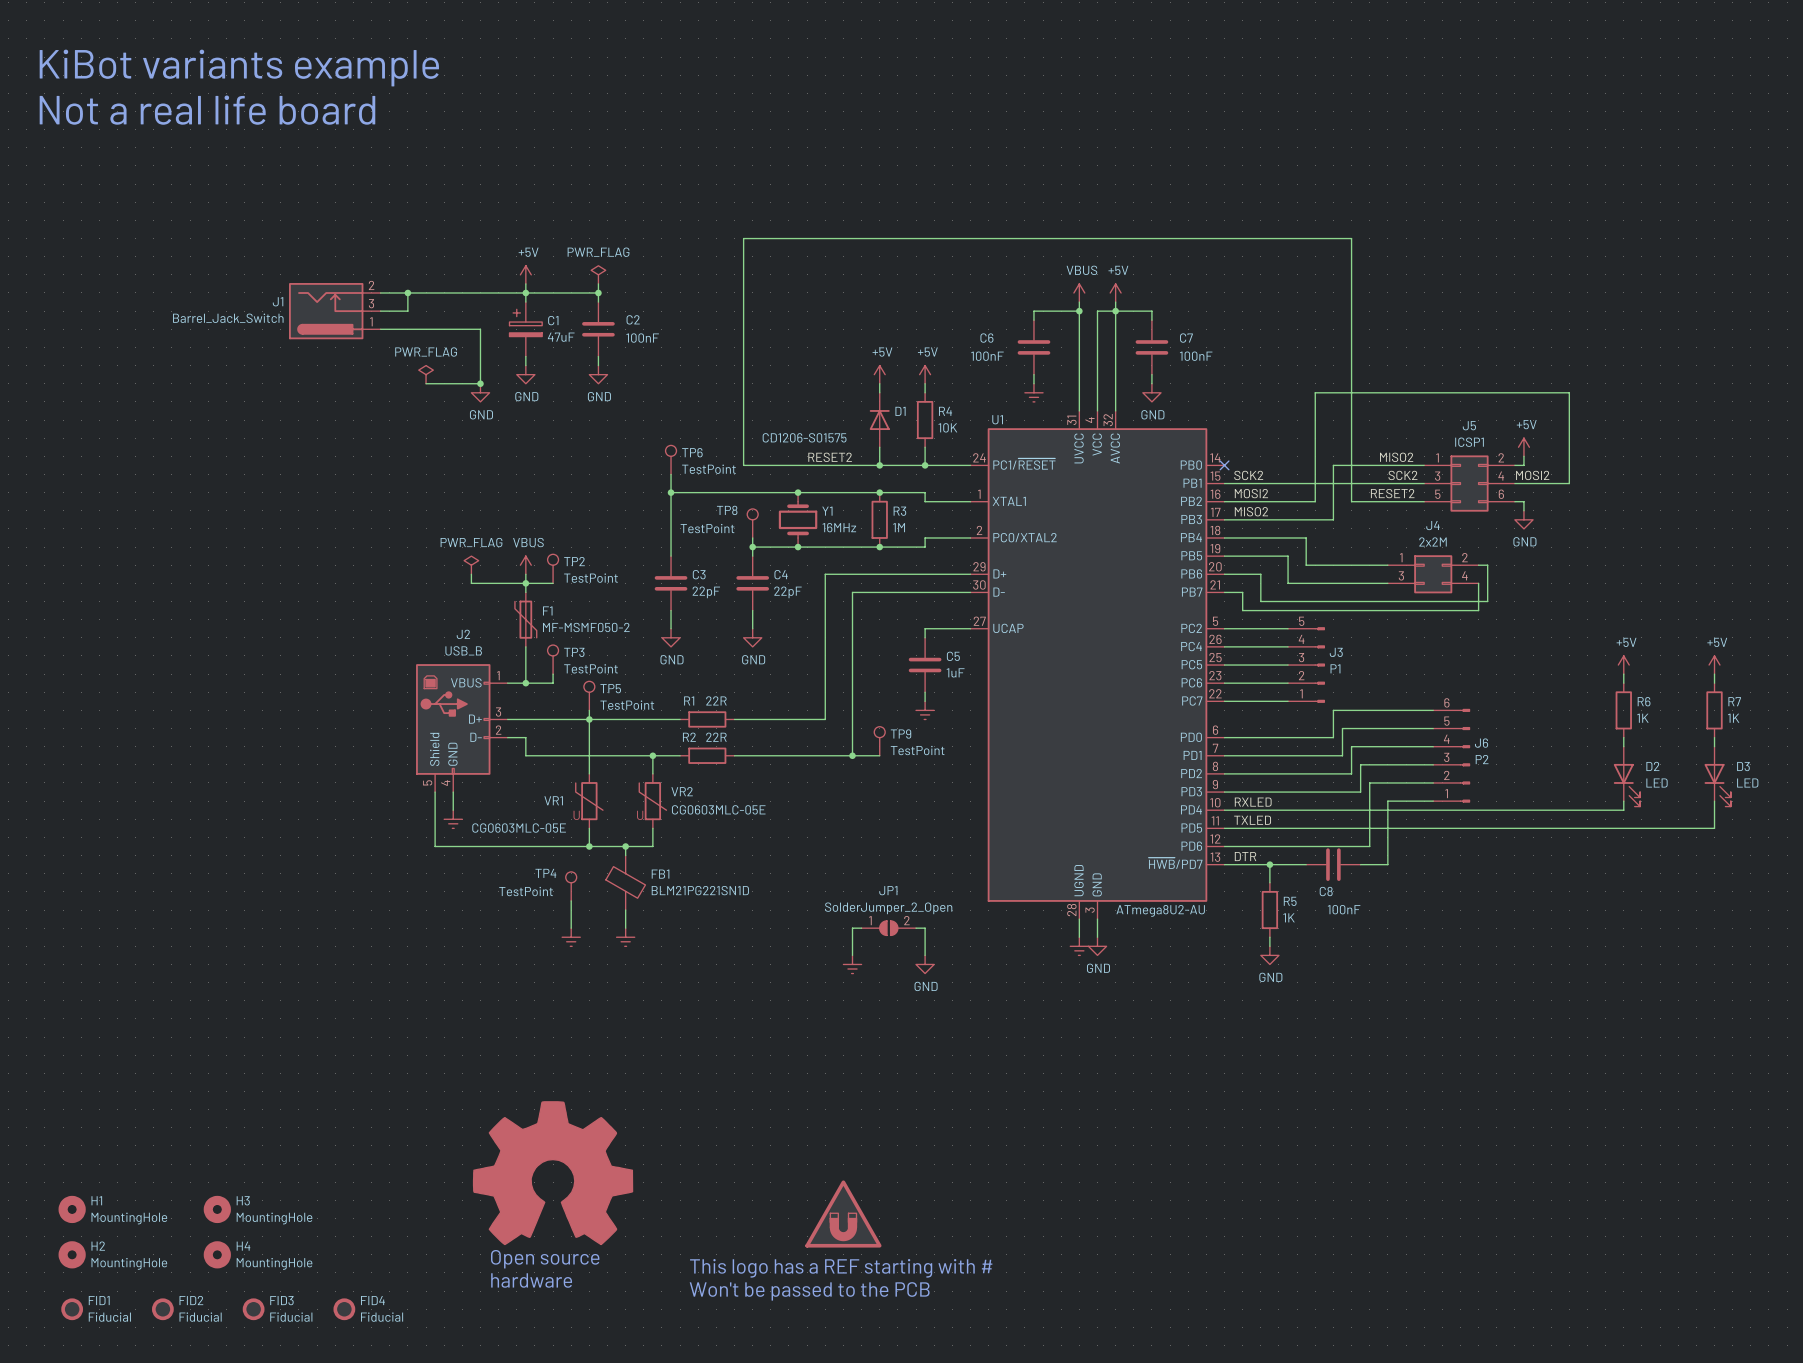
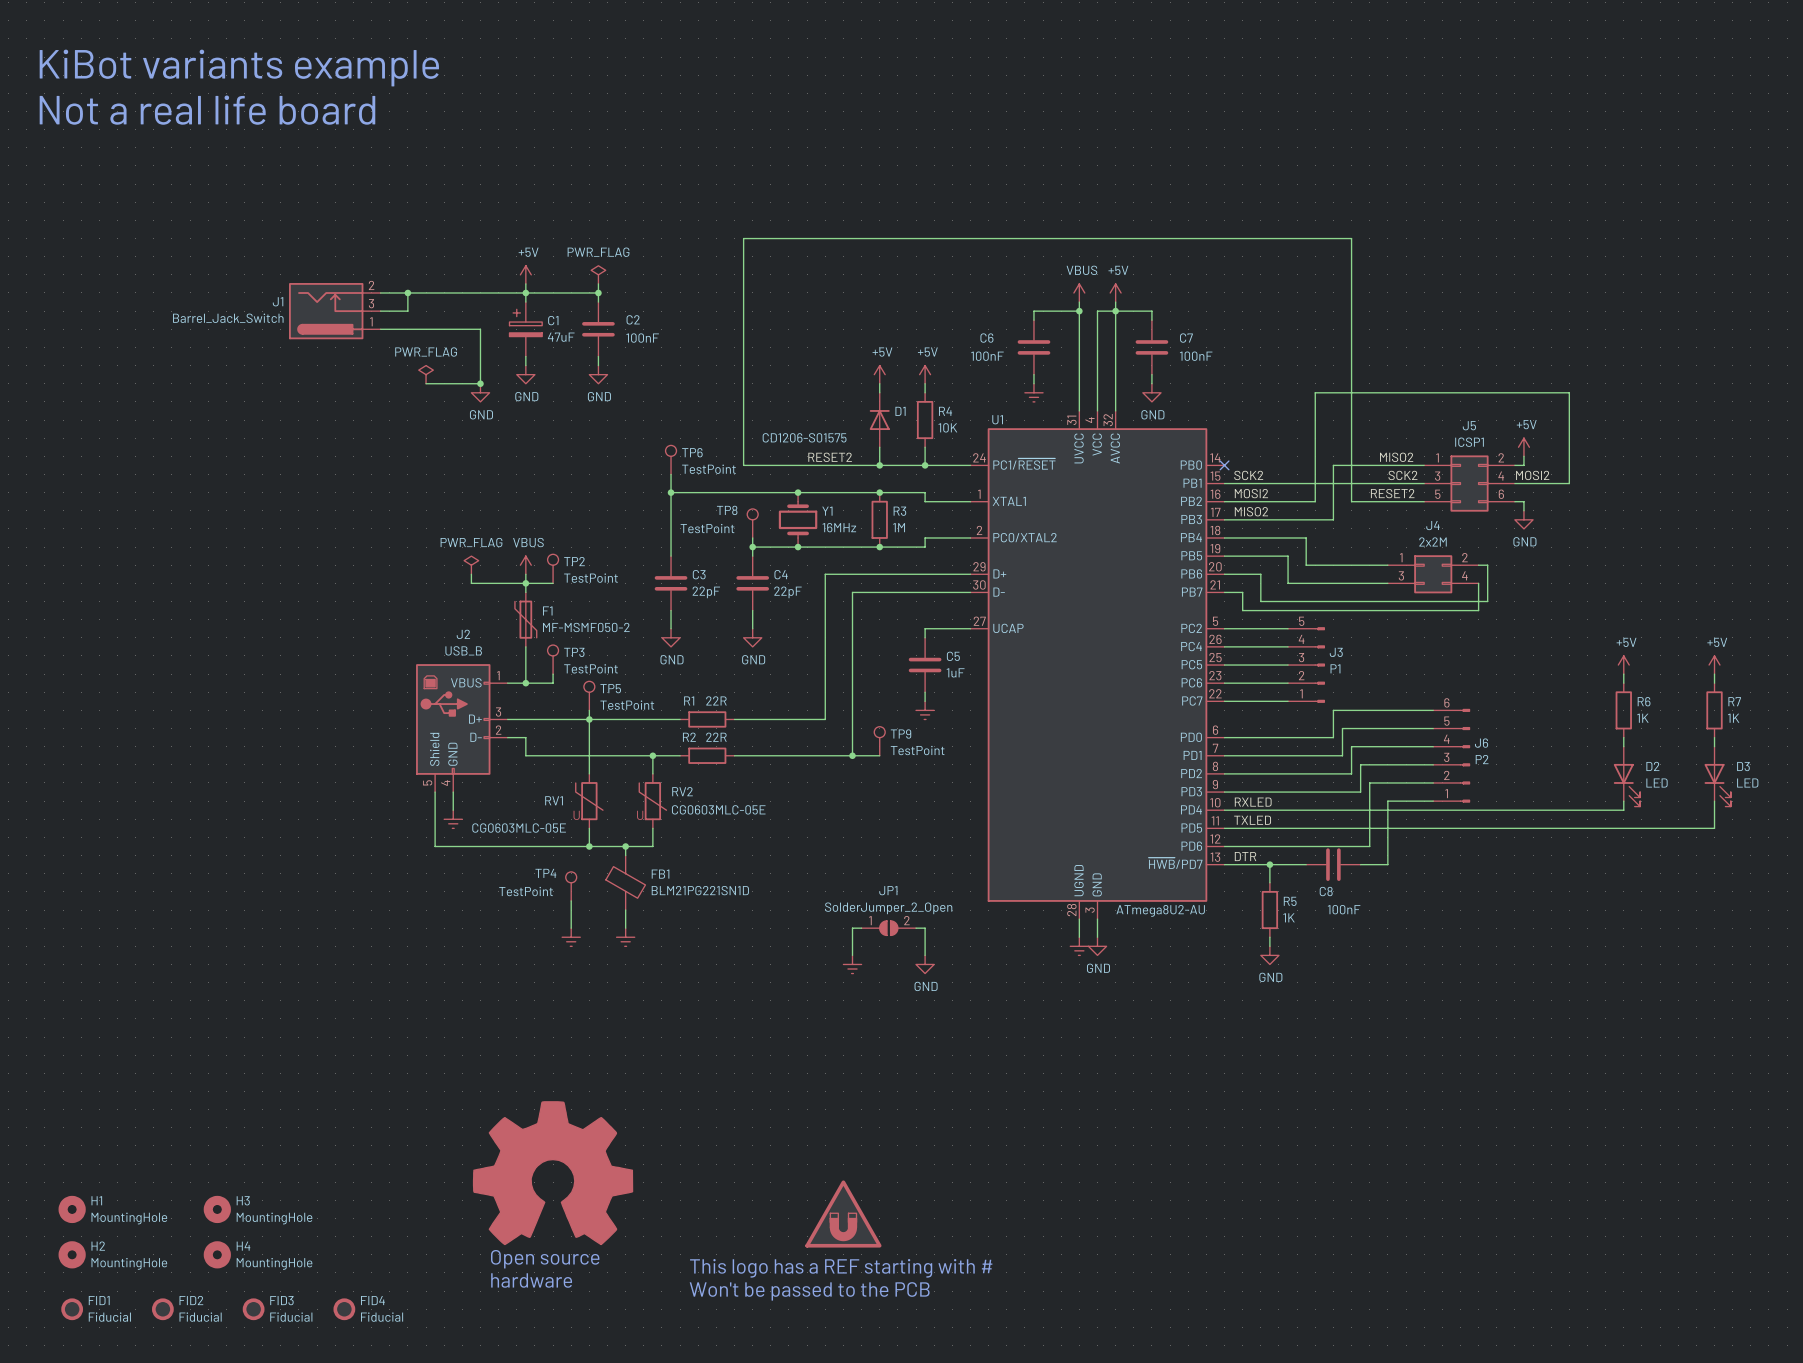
VR2 name: VR2 (682, 791) -> RV2 (682, 791)
VR1 name: VR1 (553, 800) -> RV1 (554, 800)

